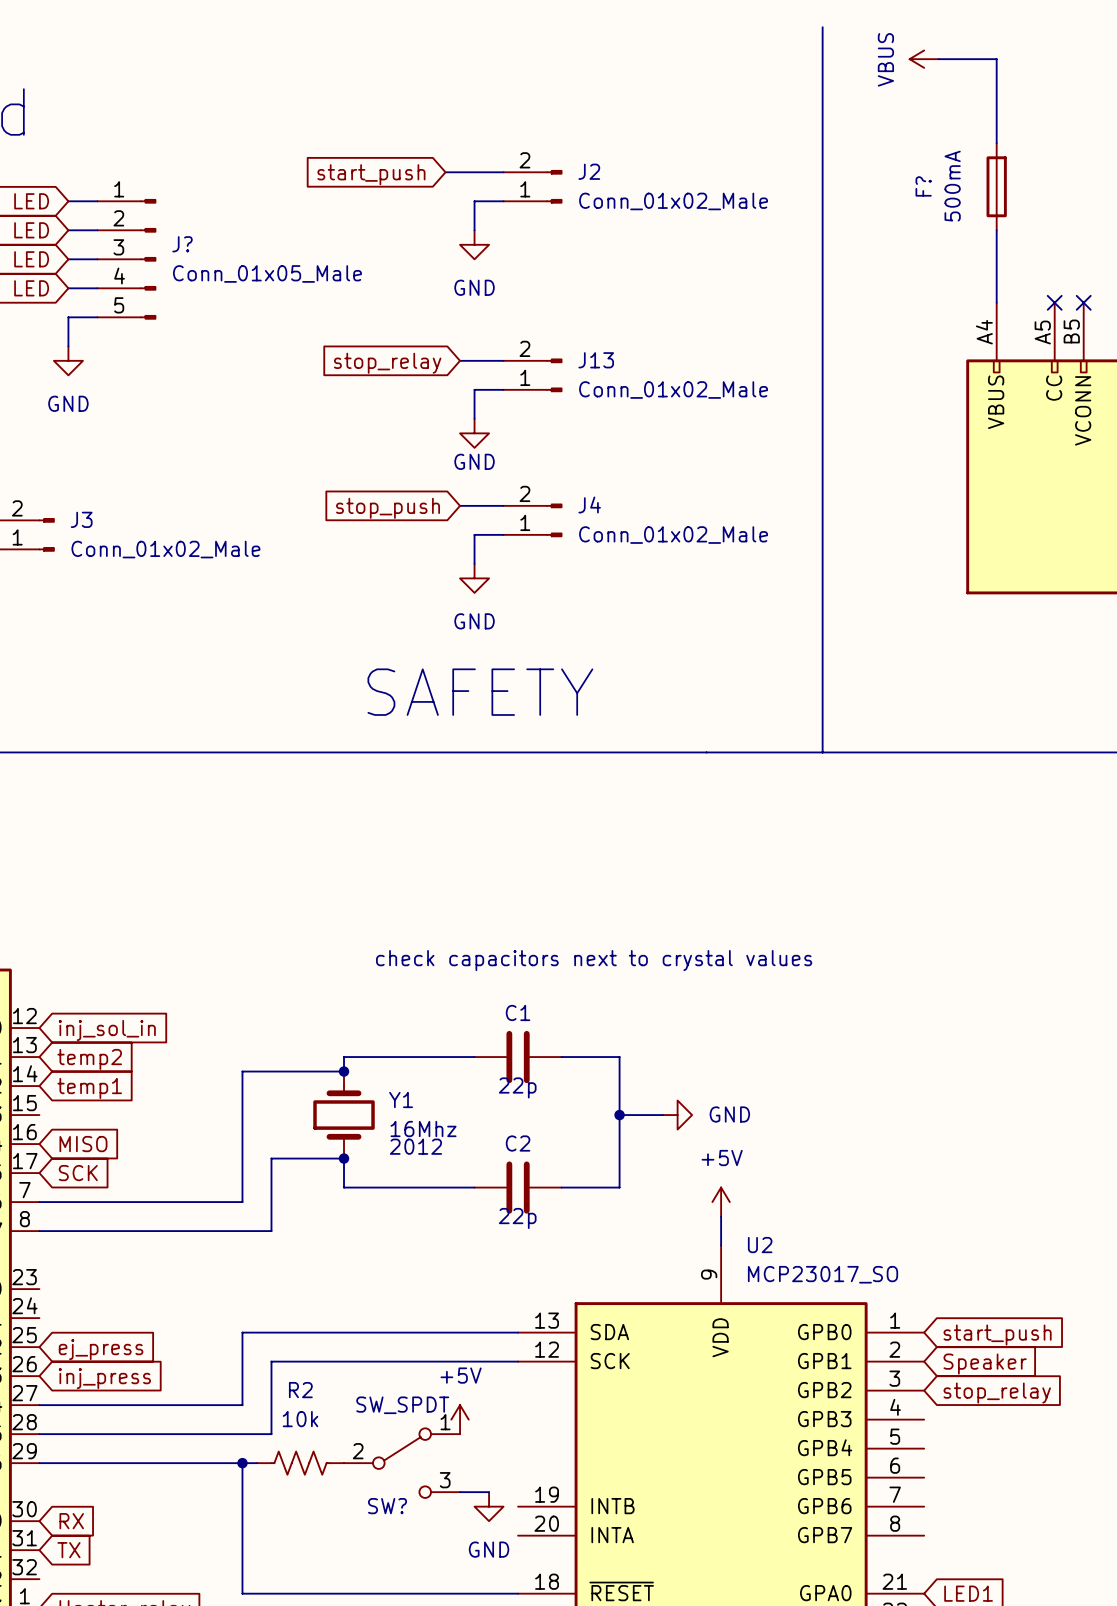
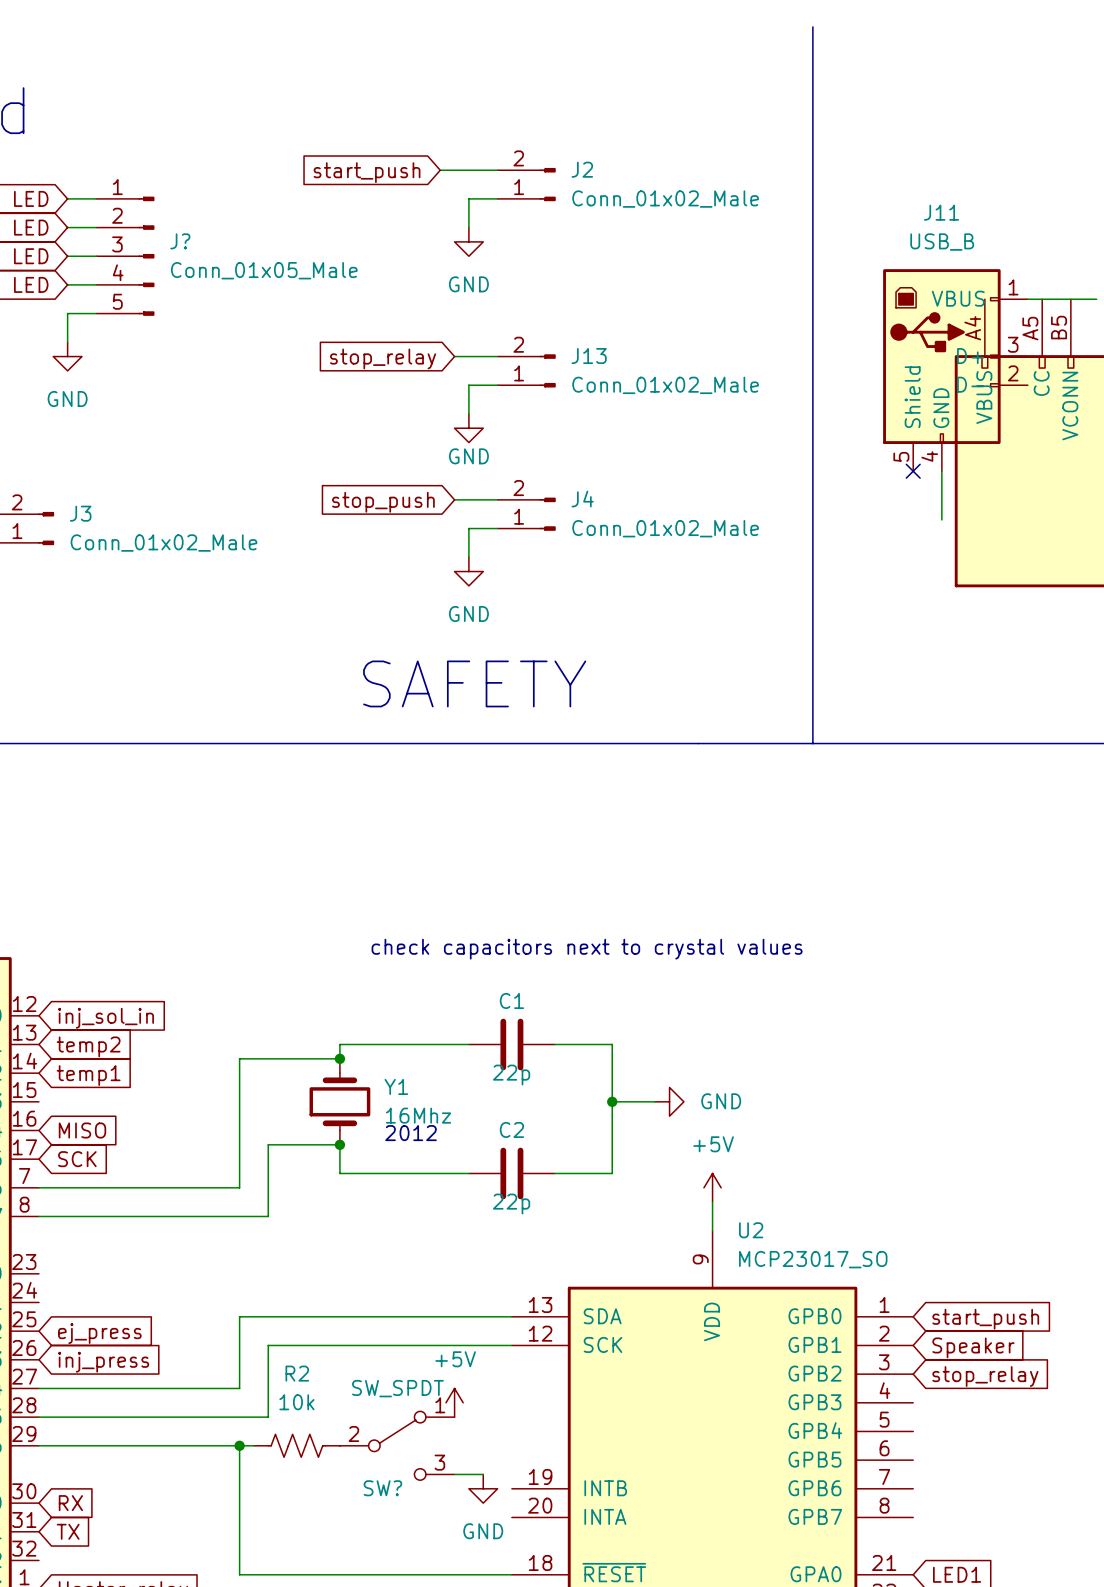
power symbol: VBUS (924, 59) -> none
wire: (938, 59) (996, 59) (996, 143) -> none
F?: 500mA (996, 186) -> none
wire: (996, 230) (996, 302) -> none
wire: none -> (1027, 299) (1096, 299)
no-connect mark: (1054, 302) -> none
no-connect mark: (1083, 302) -> none
J11: none -> USB_B (955, 370)
no-connect mark: none -> (913, 471)
wire: none -> (941, 471) (941, 519)

